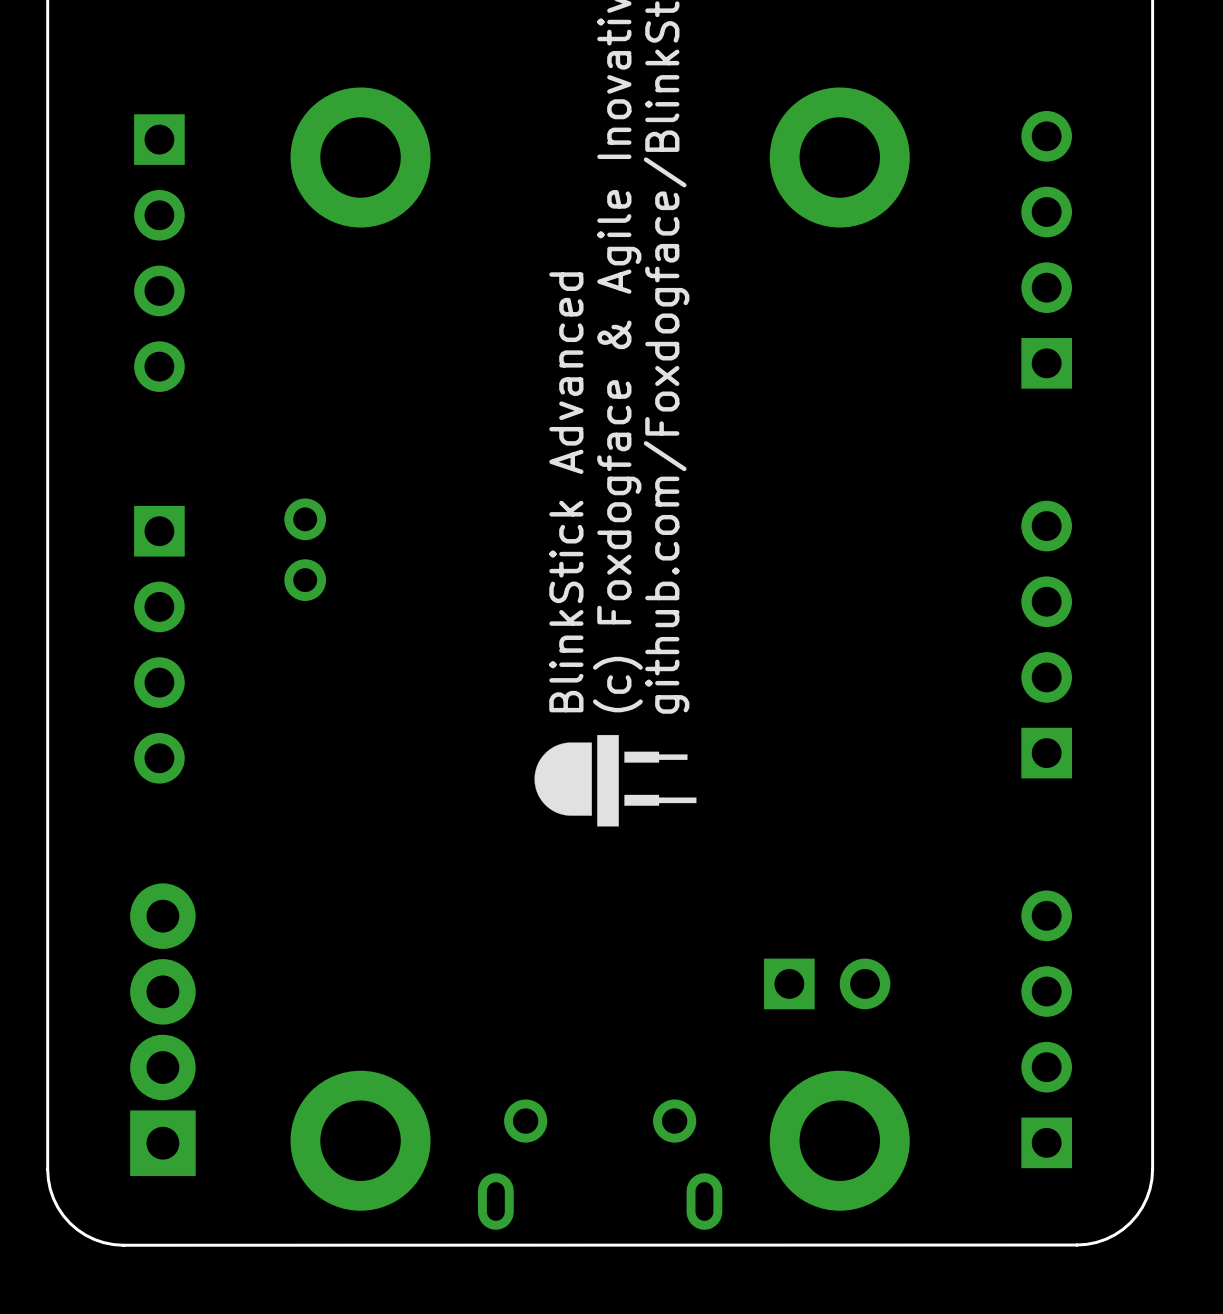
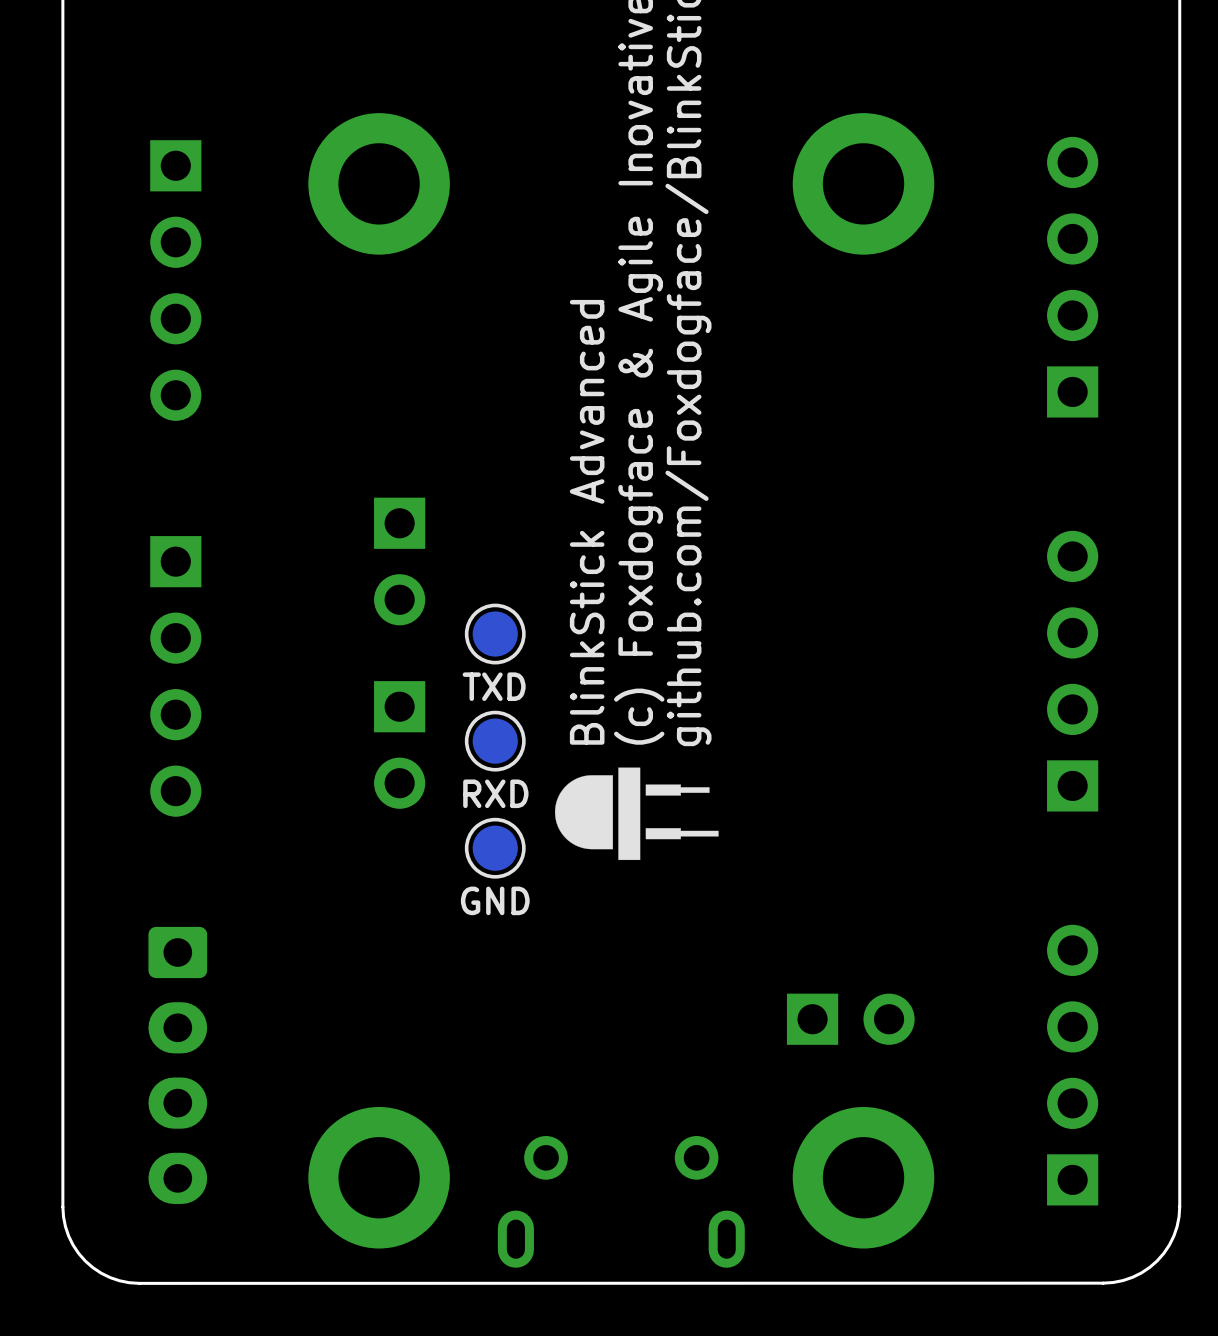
part: none -> (399, 561)
part: (305, 549) -> none
part: none -> TXD (495, 634)
part: none -> RXD (495, 741)
part: none -> (399, 744)
part: none -> GND (495, 848)
part footprint: [130, 883, 196, 1176] -> [148, 926, 208, 1204]

